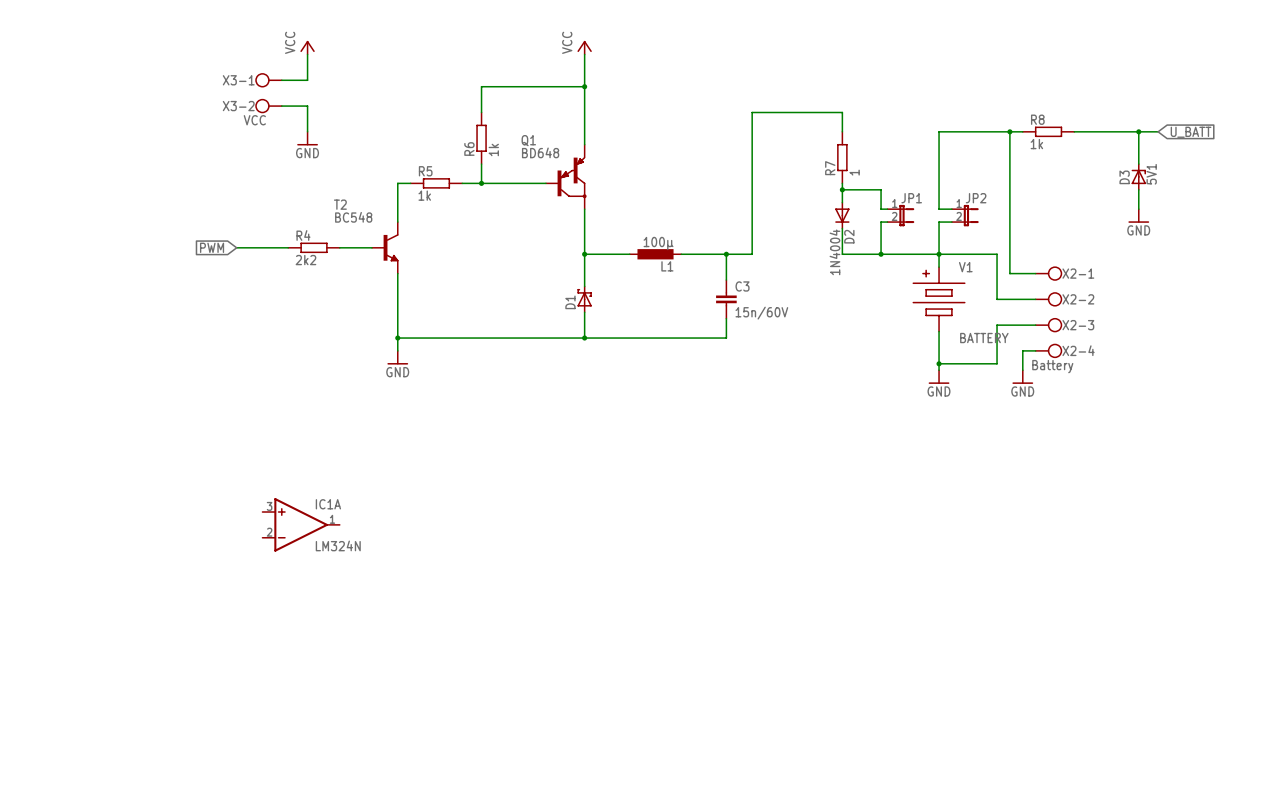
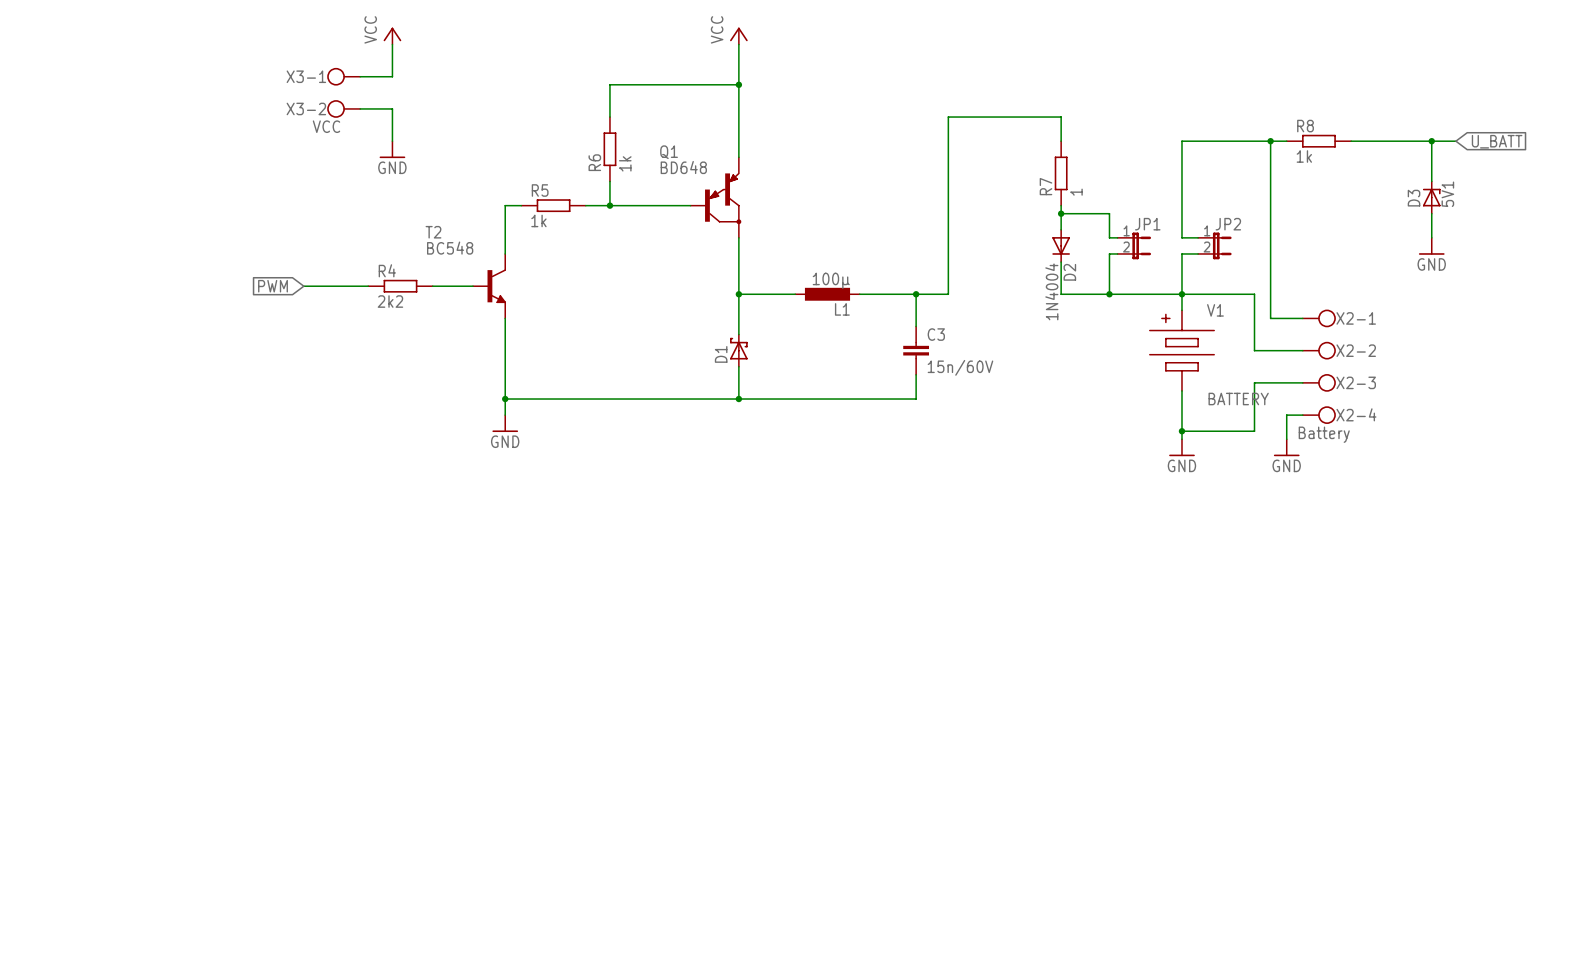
IC1A: LM324N (301, 524) -> none

